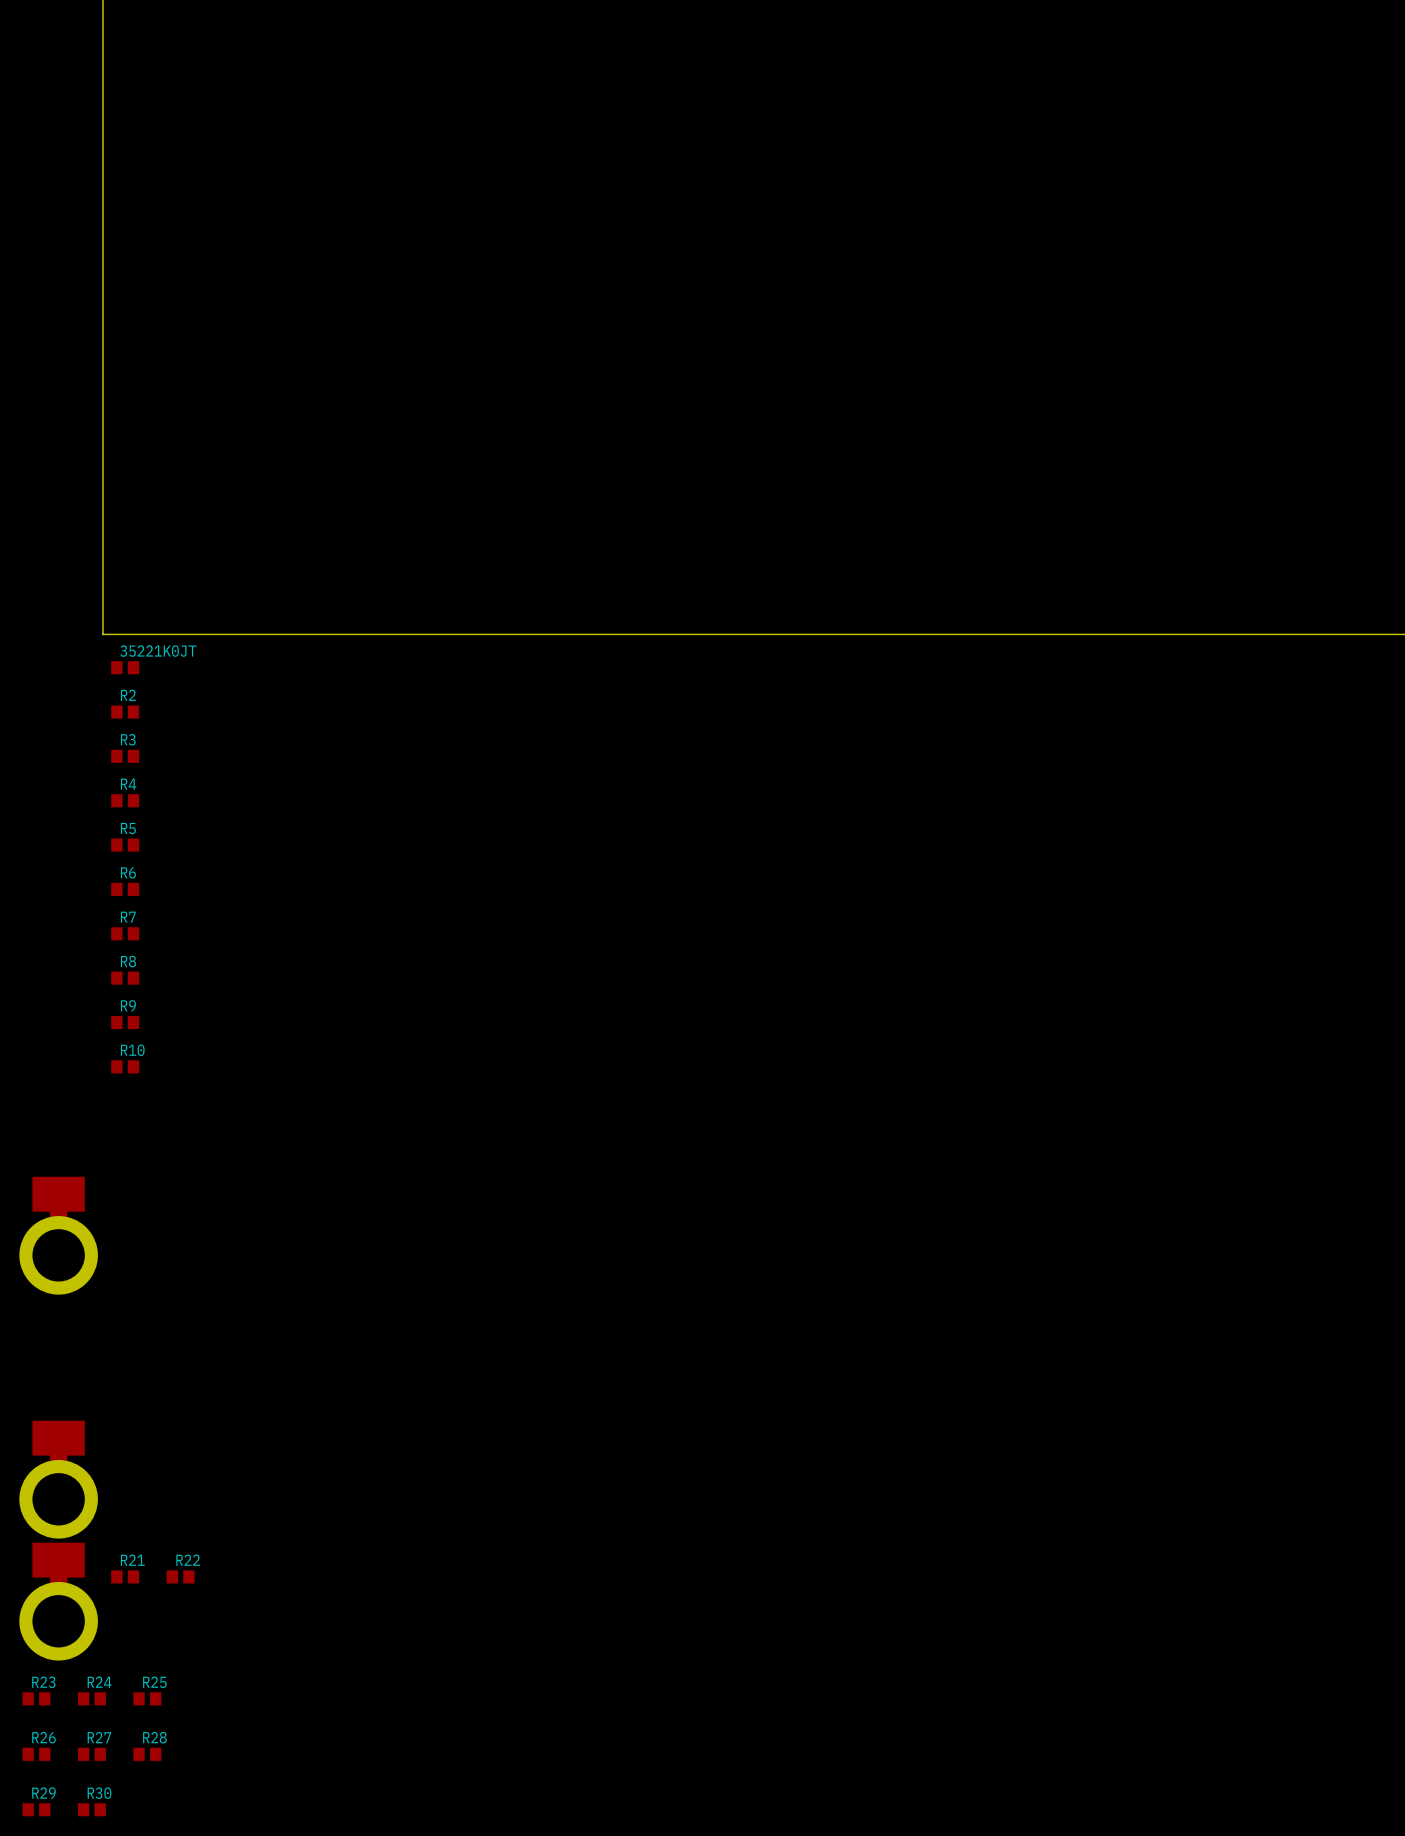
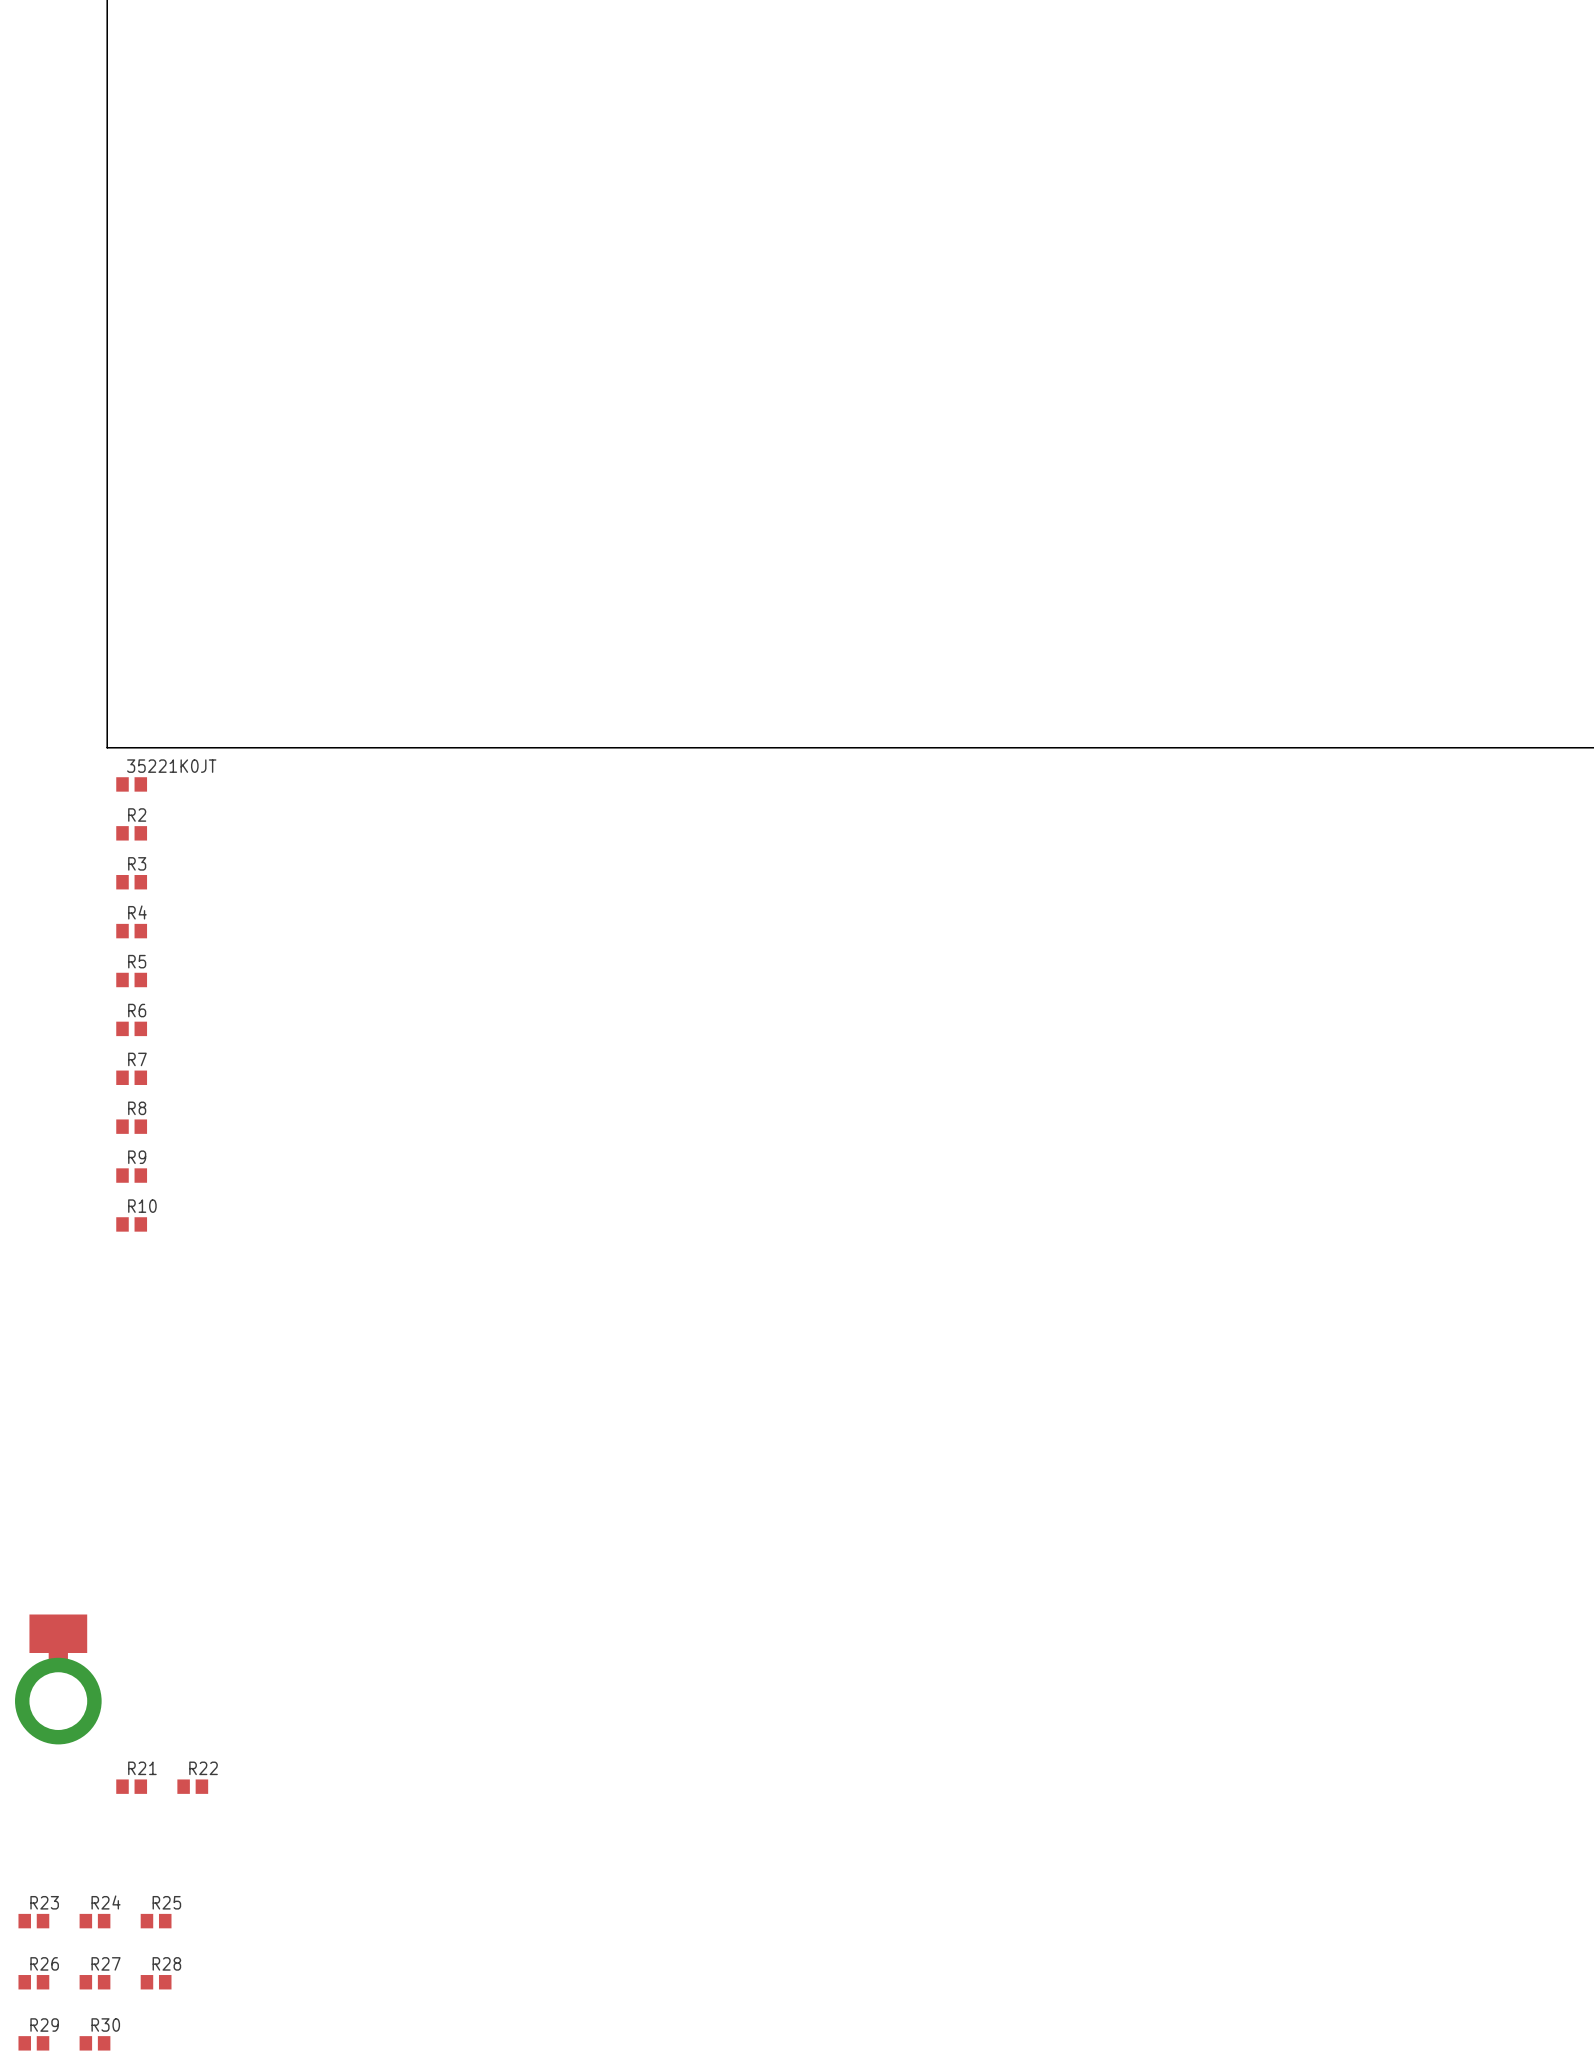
part: (58, 1235) -> none
part: (58, 1601) -> none

